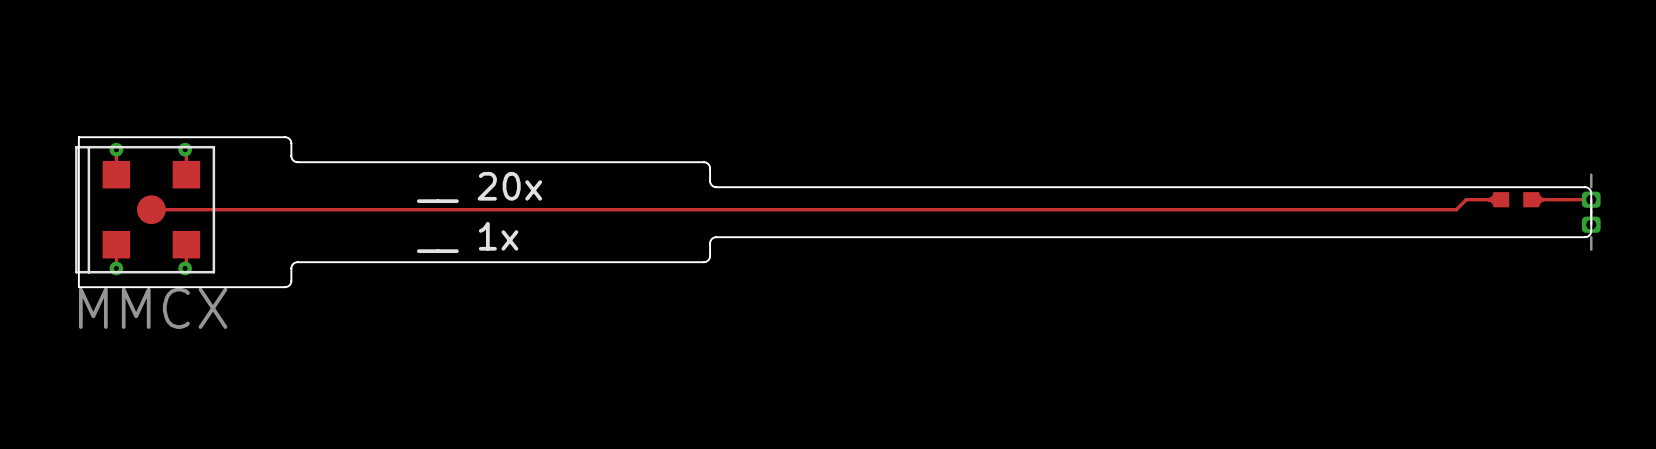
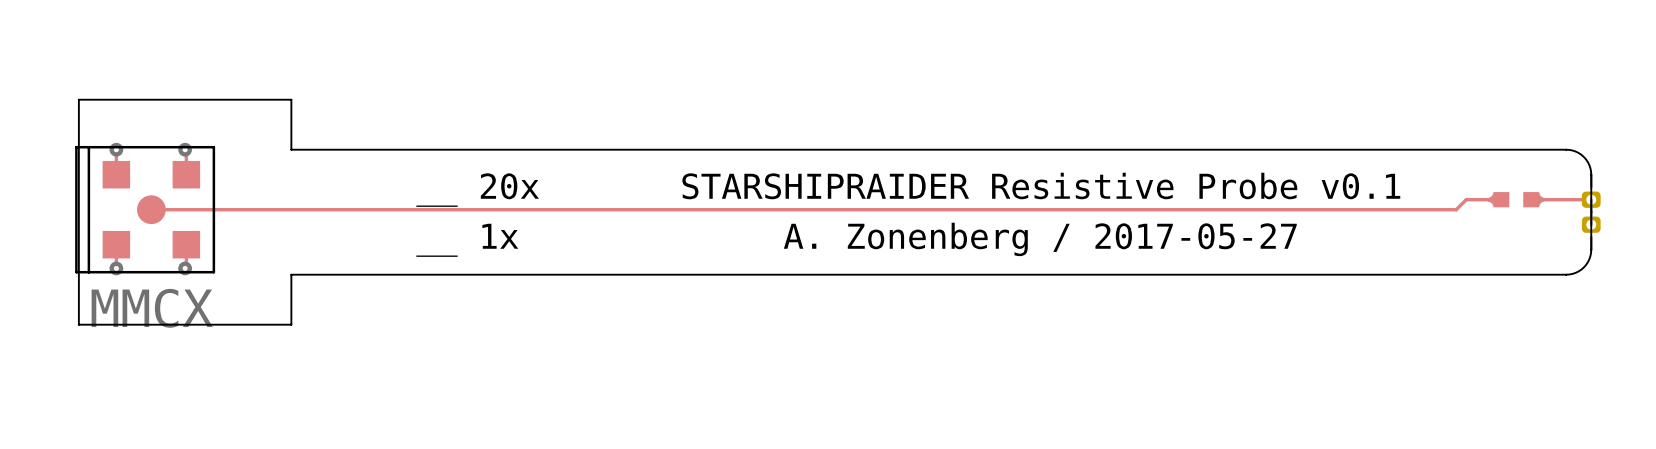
board edge: (78, 137) (285, 137) (289, 139) (291, 143) -> (78, 137) (78, 99) (291, 99) (291, 143)
board edge: (291, 149) (292, 159) (297, 162) (704, 162) (709, 166) (710, 183) (716, 187) (1585, 187) (1589, 189) (1591, 193) -> (291, 149) (1566, 149) (1578, 153) (1587, 162) (1591, 171) (1591, 193)
text: none -> STARSHIPRAIDER Resistive Probe v0.1 (1041, 185)
board edge: (1591, 230) (1589, 235) (1585, 237) (716, 237) (710, 241) (709, 257) (704, 262) (297, 262) (292, 265) (291, 274) -> (1591, 230) (1591, 252) (1587, 262) (1578, 271) (1566, 274) (291, 274)
text: none -> A. Zonenberg / 2017-05-27 (1040, 239)
board edge: (291, 280) (289, 285) (285, 287) (78, 287) -> (291, 280) (291, 324) (78, 324) (78, 287)

